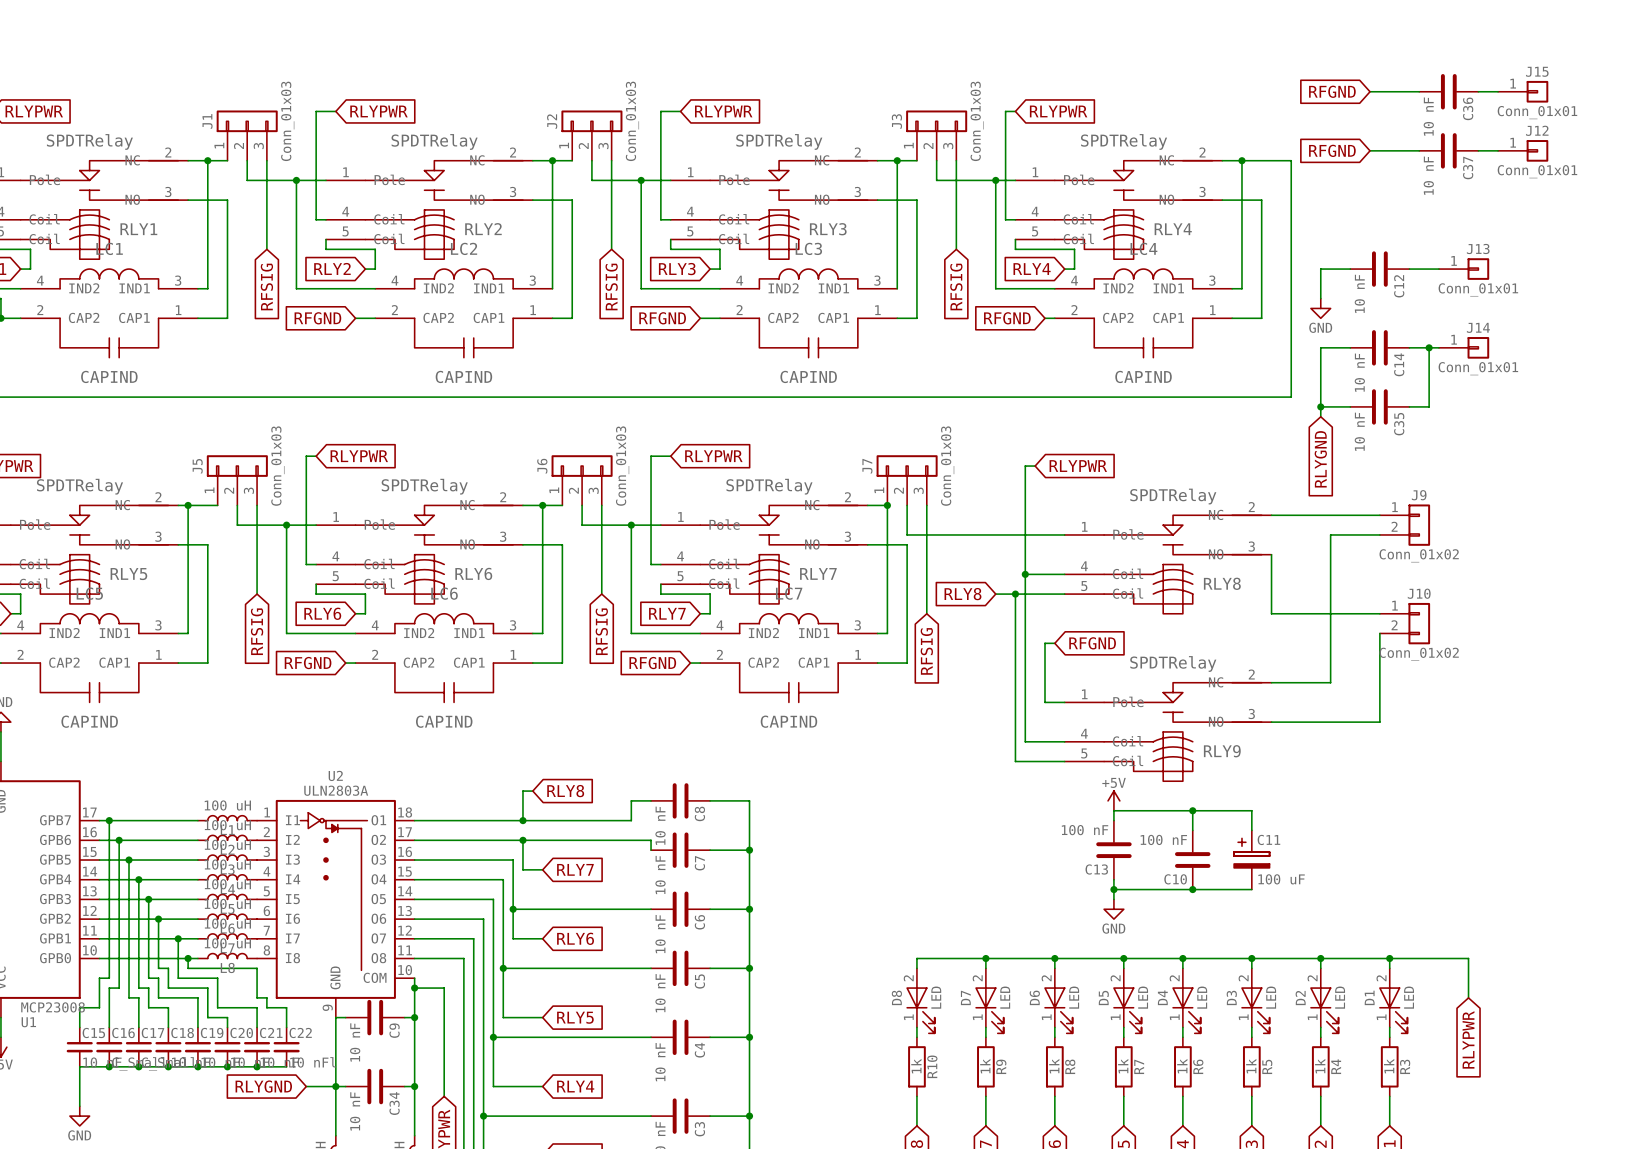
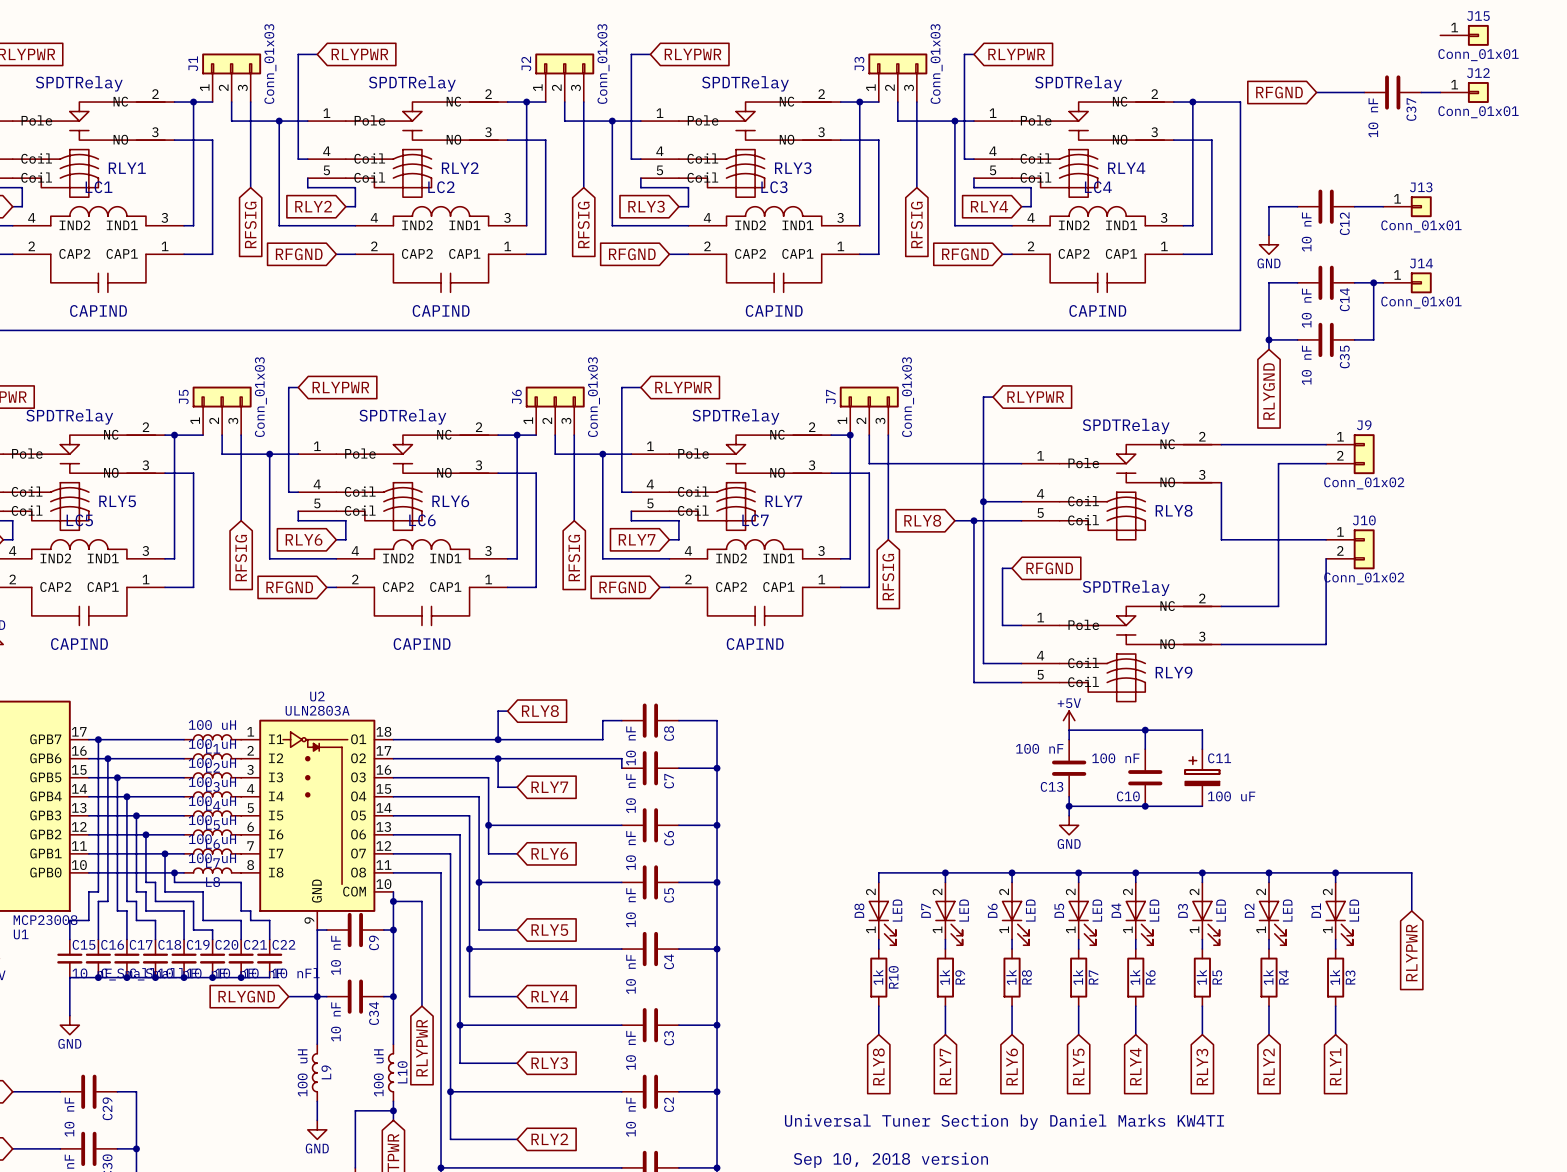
global label: RFGND (1332, 91) -> none
wire: (1370, 91) (1419, 91) -> none
C36: 10 nF (1448, 91) -> none
wire: (1478, 91) (1498, 91) -> none

